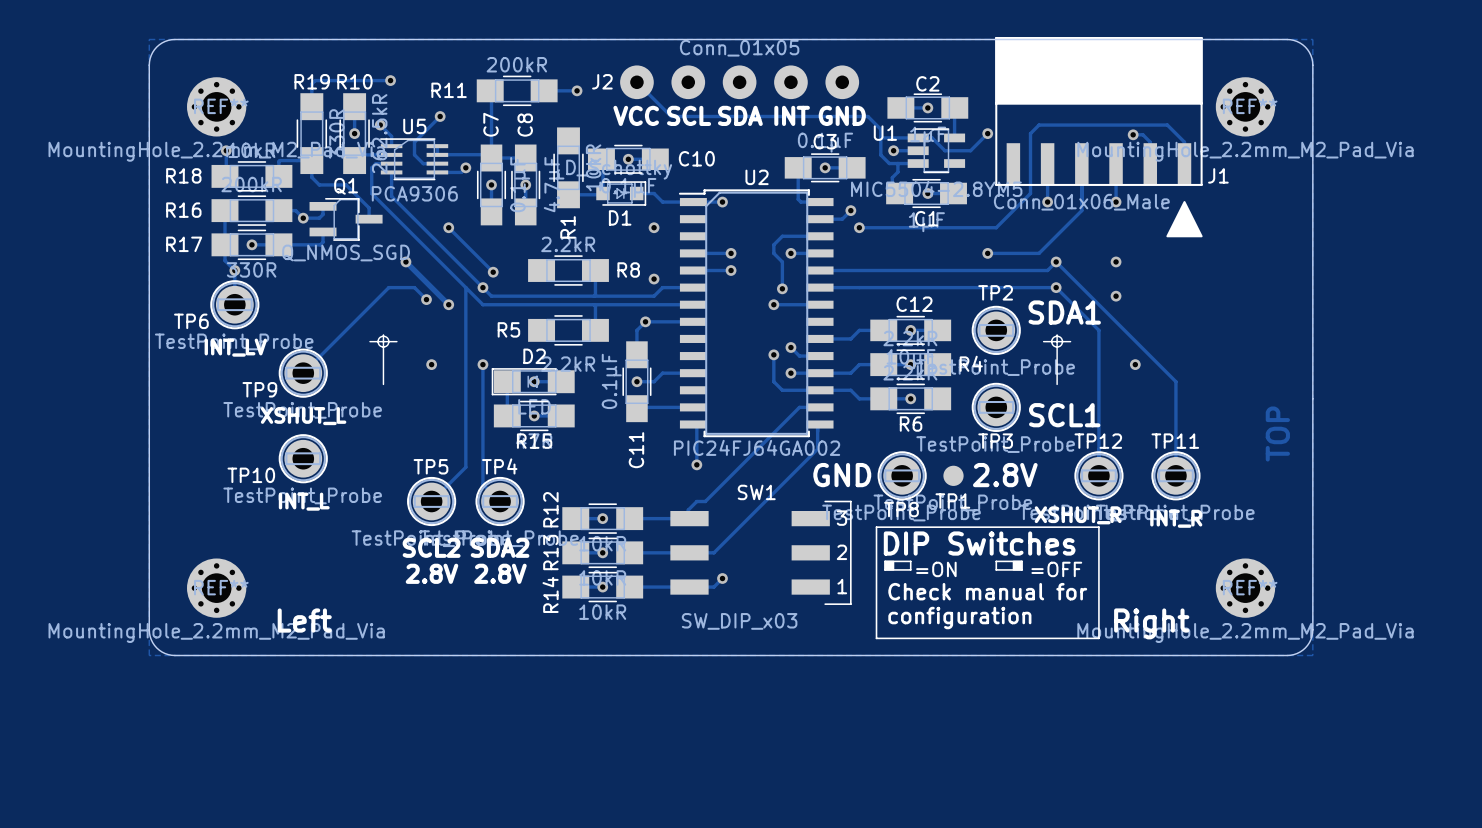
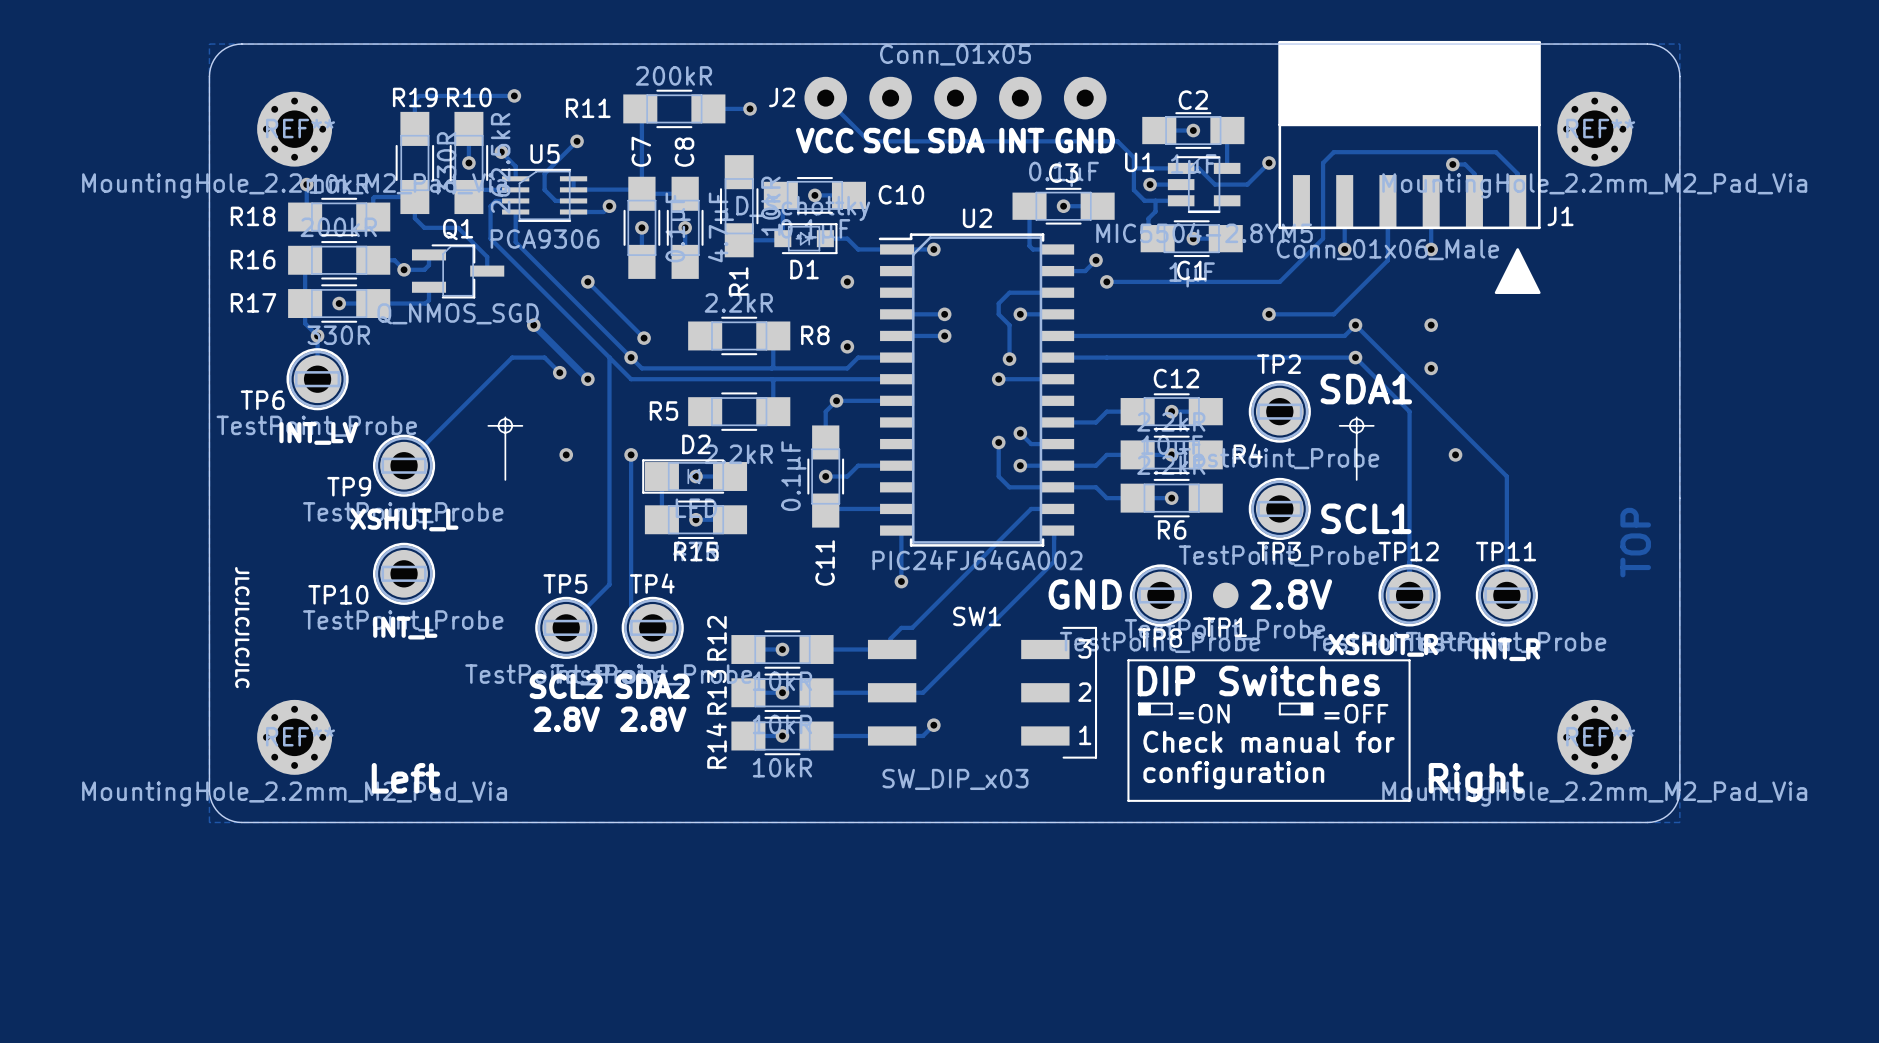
text: none -> JLCJLCJLCJLC (242, 627)

